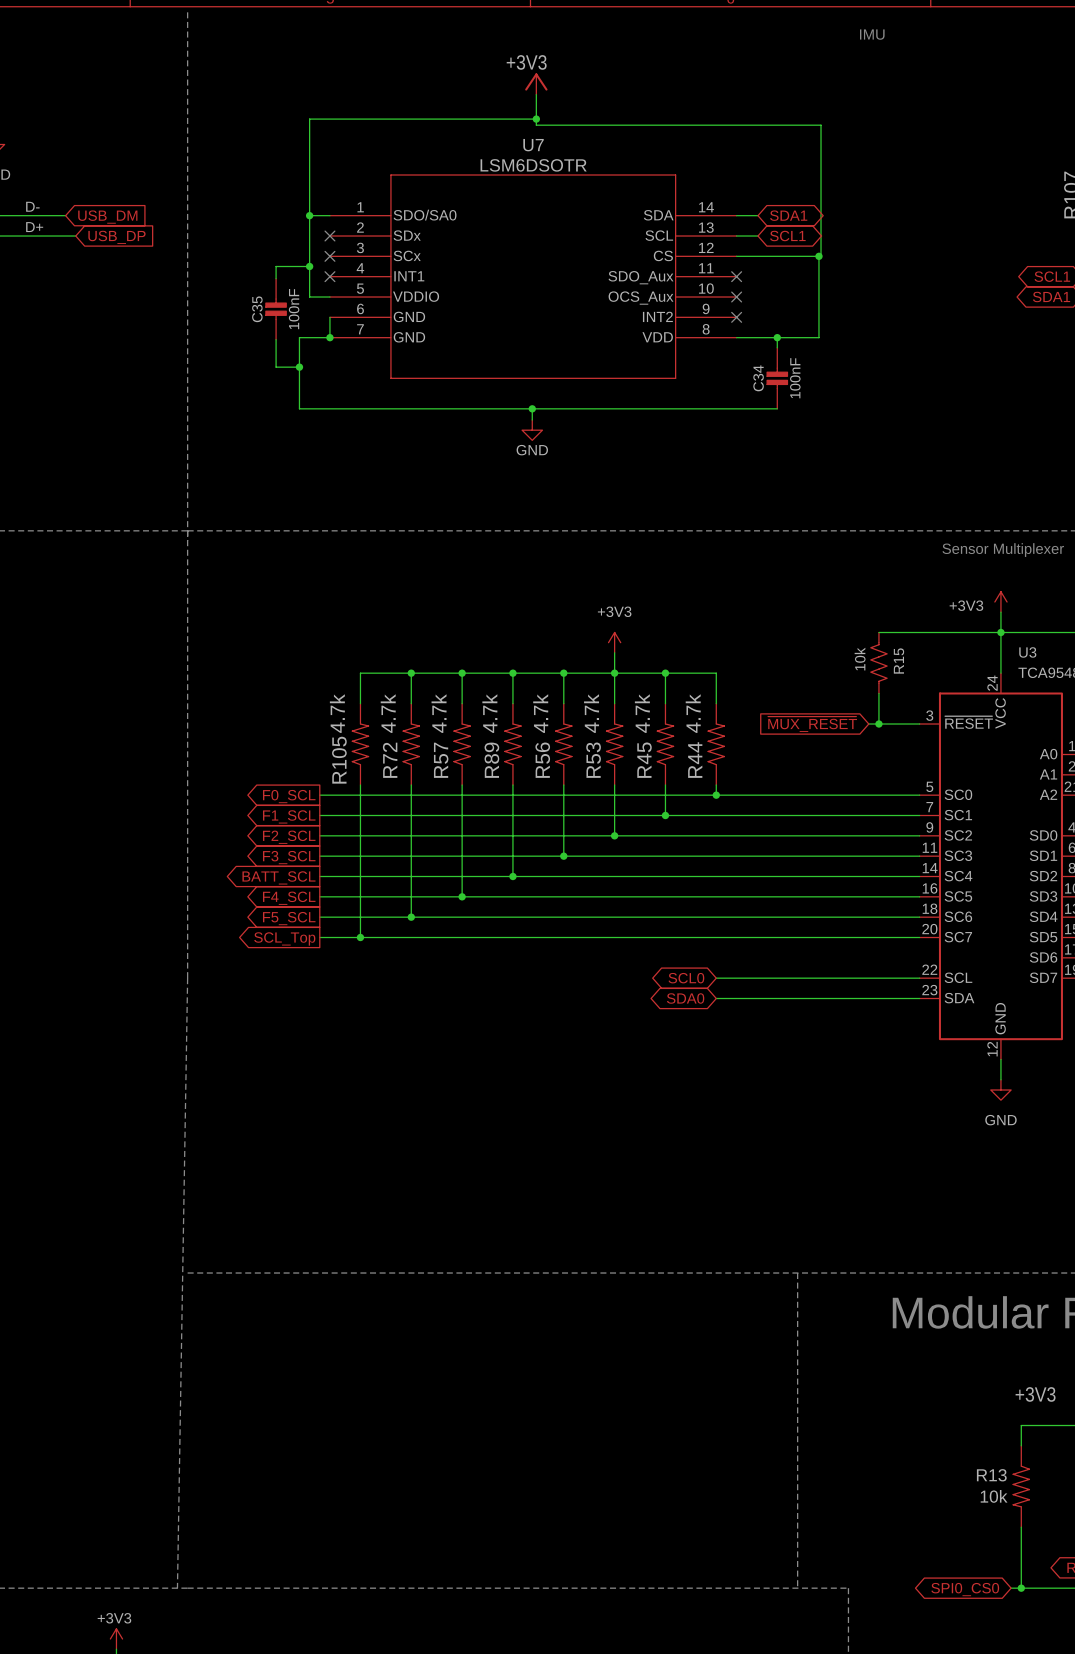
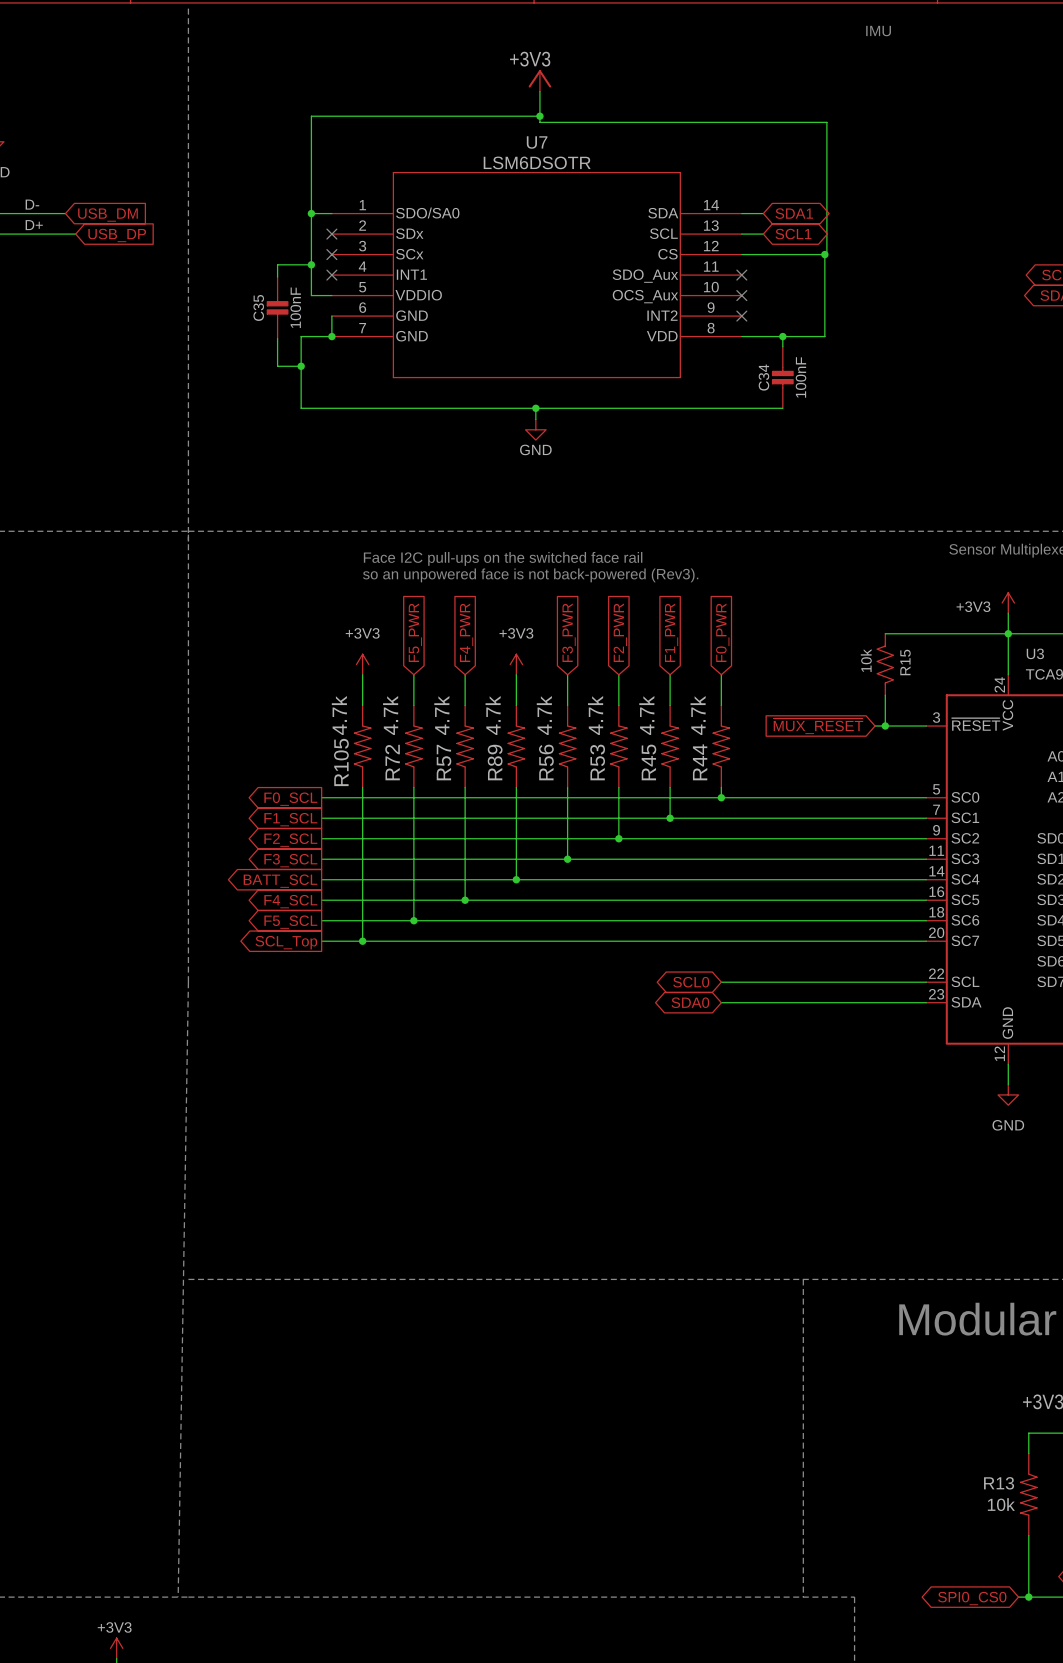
text: none -> Face I2C pull-ups on the switched face rail (503, 558)
text: none -> so an unpowered face is not back-powered (Rev3). (530, 575)
global label: none -> F5_PWR (415, 632)
global label: none -> F4_PWR (466, 632)
global label: none -> F3_PWR (569, 632)
global label: none -> F2_PWR (620, 632)
global label: none -> F1_PWR (671, 632)
global label: none -> F0_PWR (722, 632)
power symbol position: +3V3 (614, 642) -> +3V3 (516, 664)
wire: (614, 652) (614, 673) -> none
power symbol: none -> +3V3 (362, 664)
wire: (360, 673) (716, 673) -> none
junction: (411, 673) -> none
junction: (462, 673) -> none
junction: (512, 673) -> none
junction: (563, 673) -> none
junction: (614, 673) -> none
junction: (665, 673) -> none

